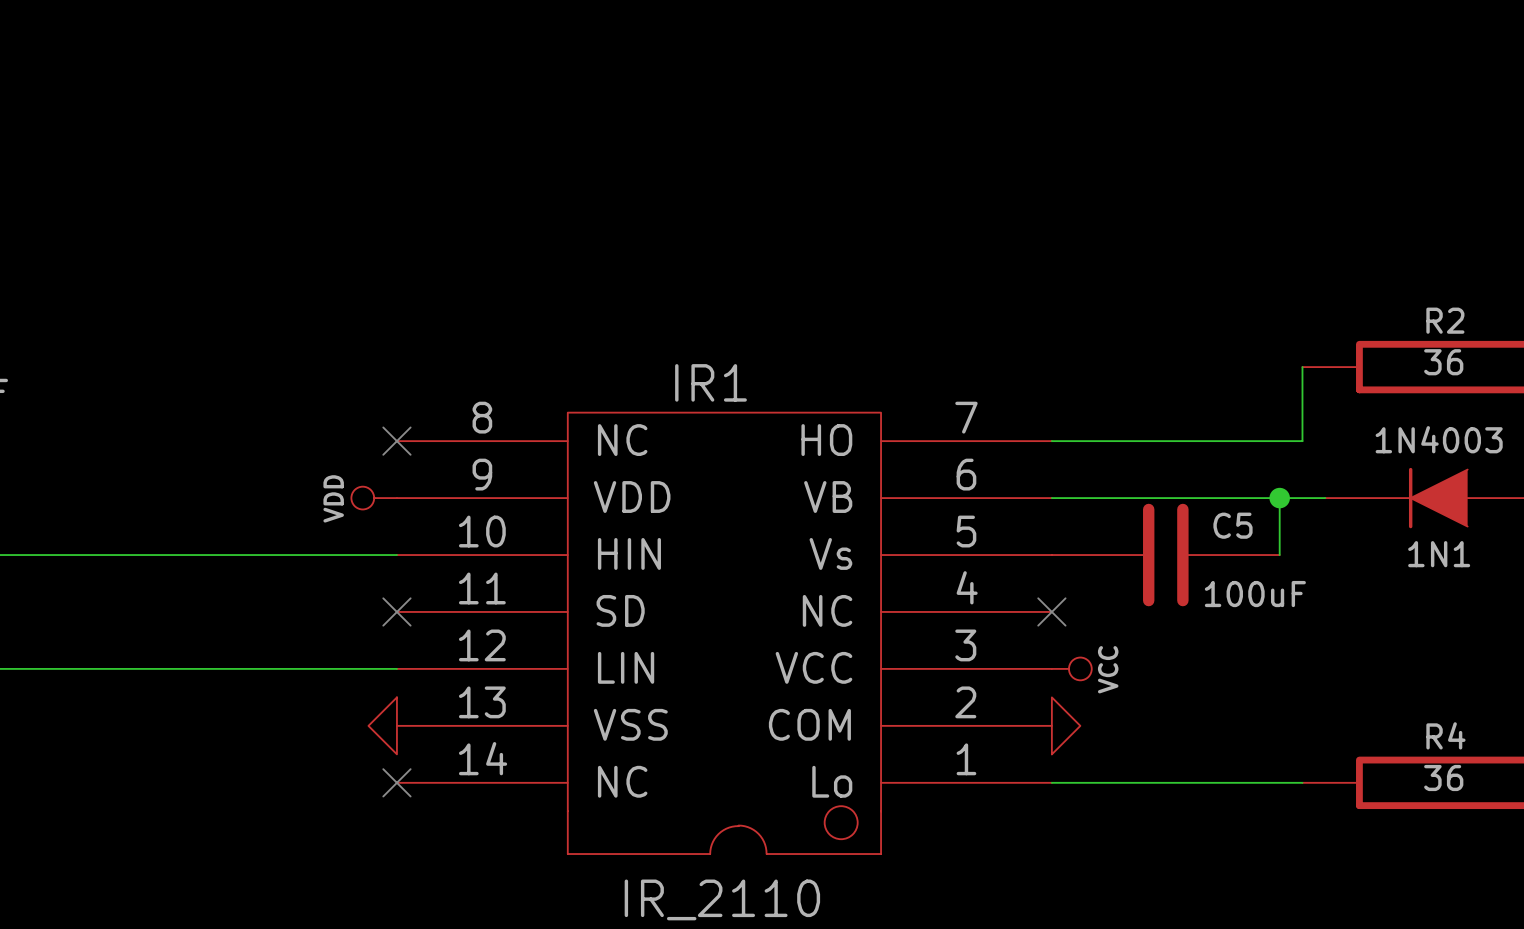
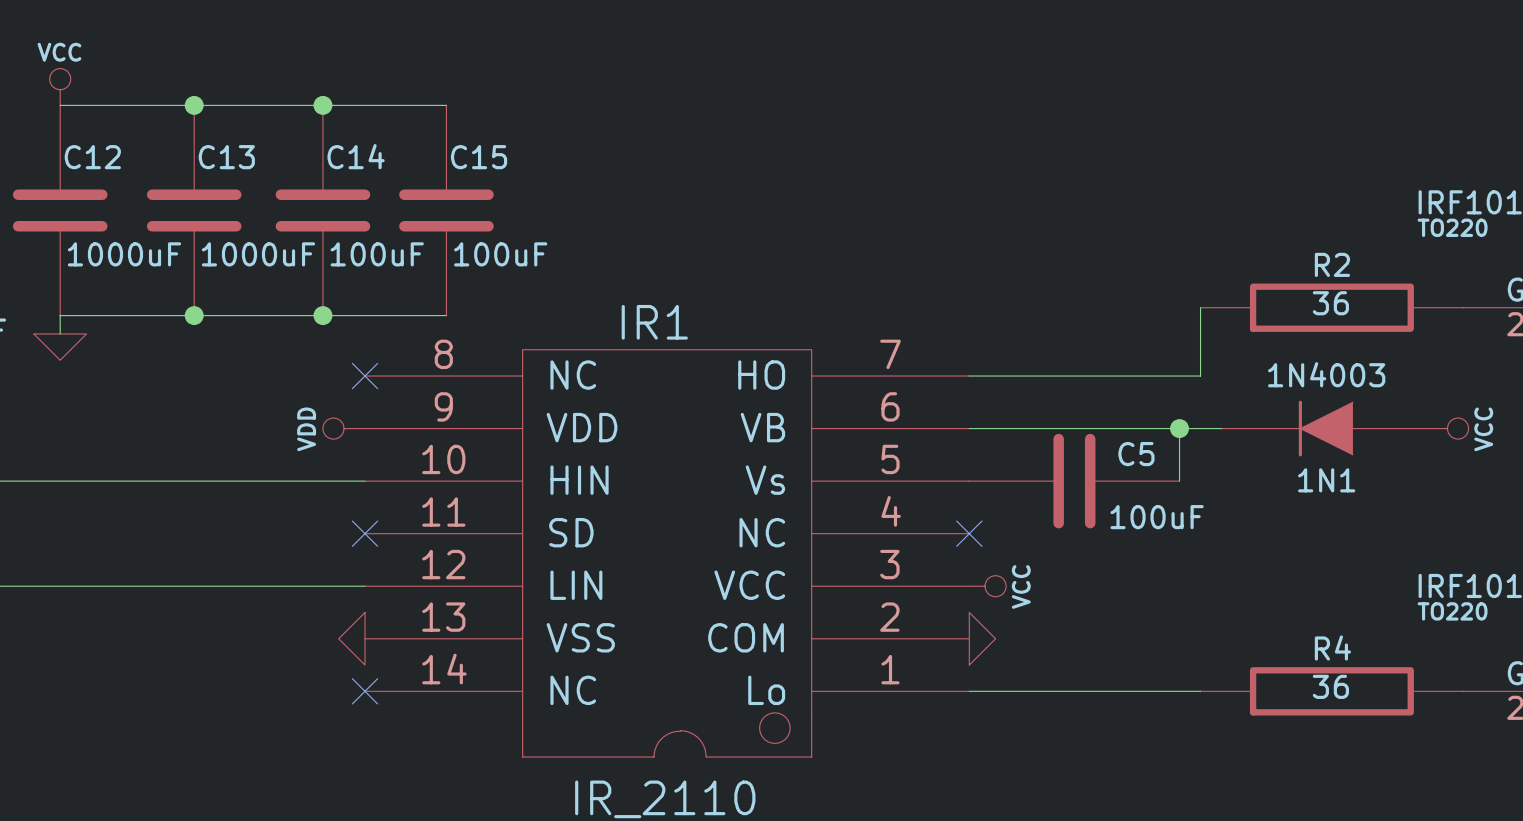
power symbol: none -> VCC (60, 86)
wire: none -> (60, 105) (446, 105)
junction: none -> (194, 105)
junction: none -> (322, 105)
C12: none -> 1000uF (60, 210)
C13: none -> 1000uF (194, 210)
C14: none -> 100uF (322, 210)
C15: none -> 100uF (446, 210)
junction: none -> (194, 315)
junction: none -> (322, 315)
wire: none -> (446, 315) (60, 315) (60, 333)
power symbol: none -> (60, 347)

